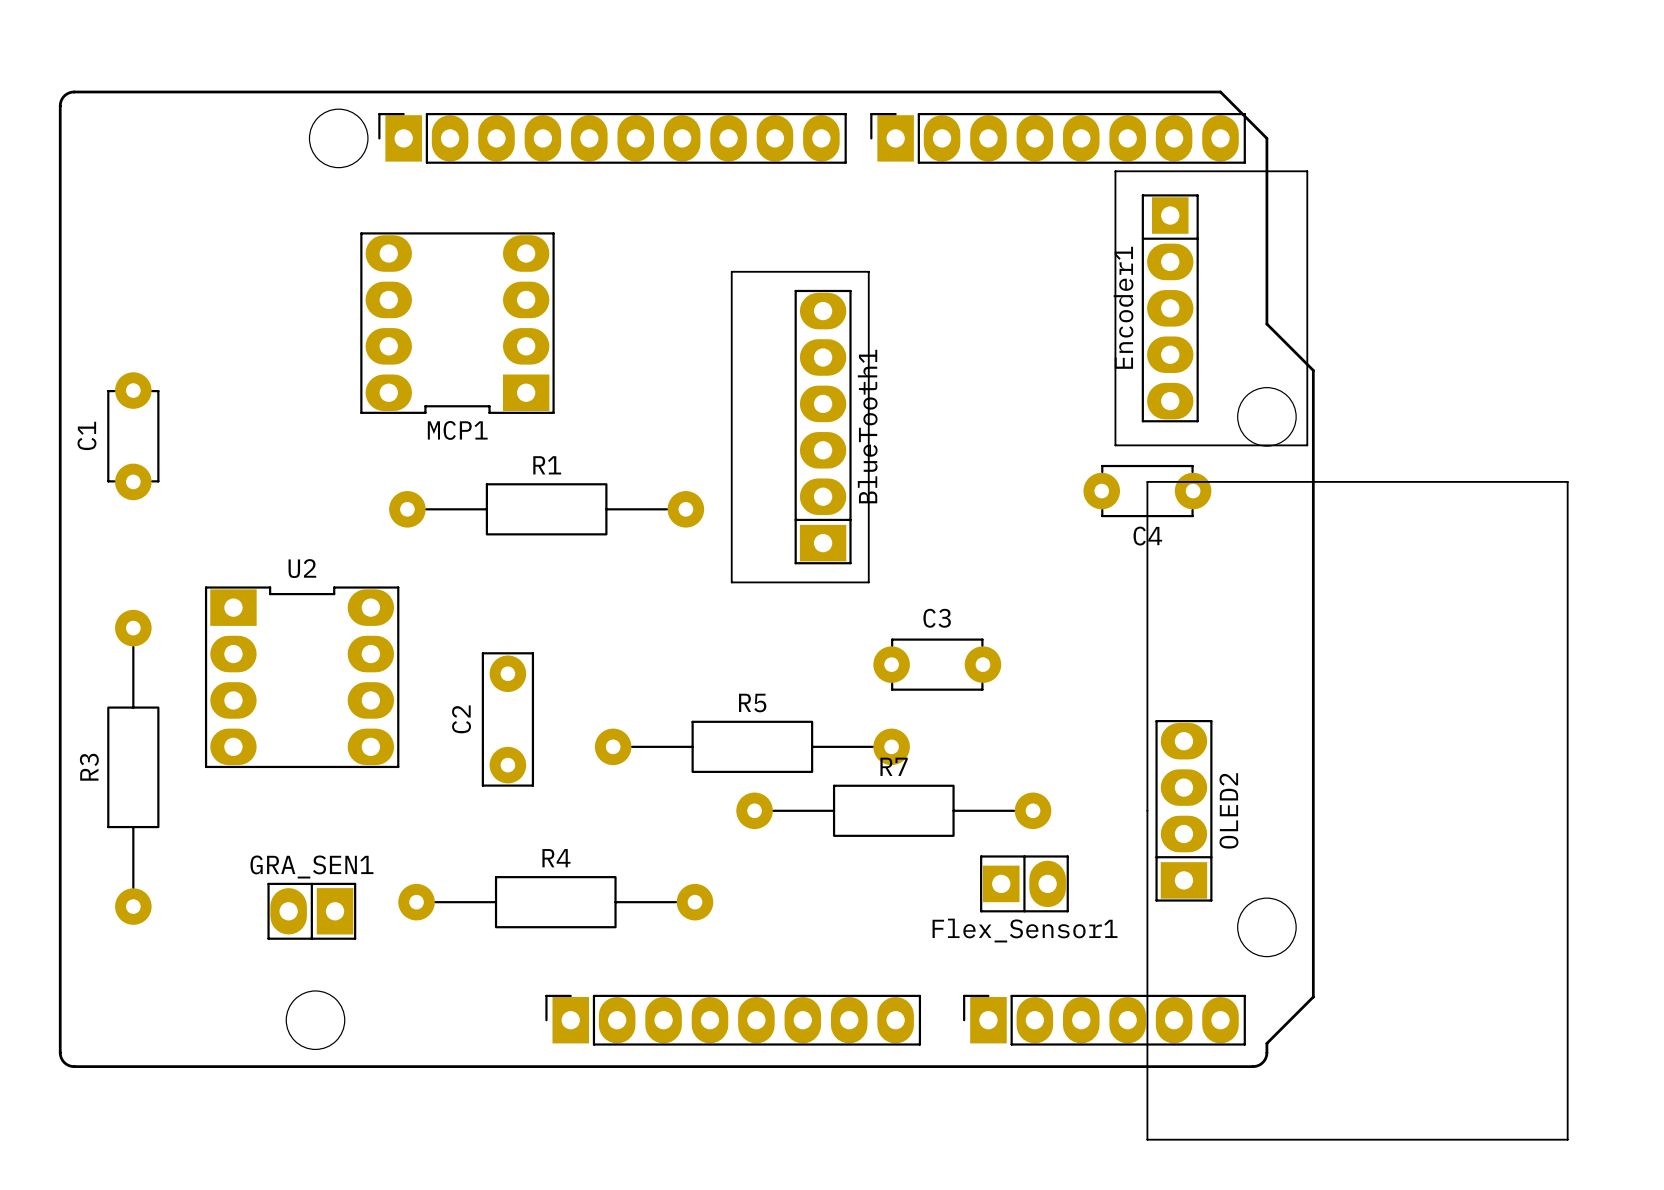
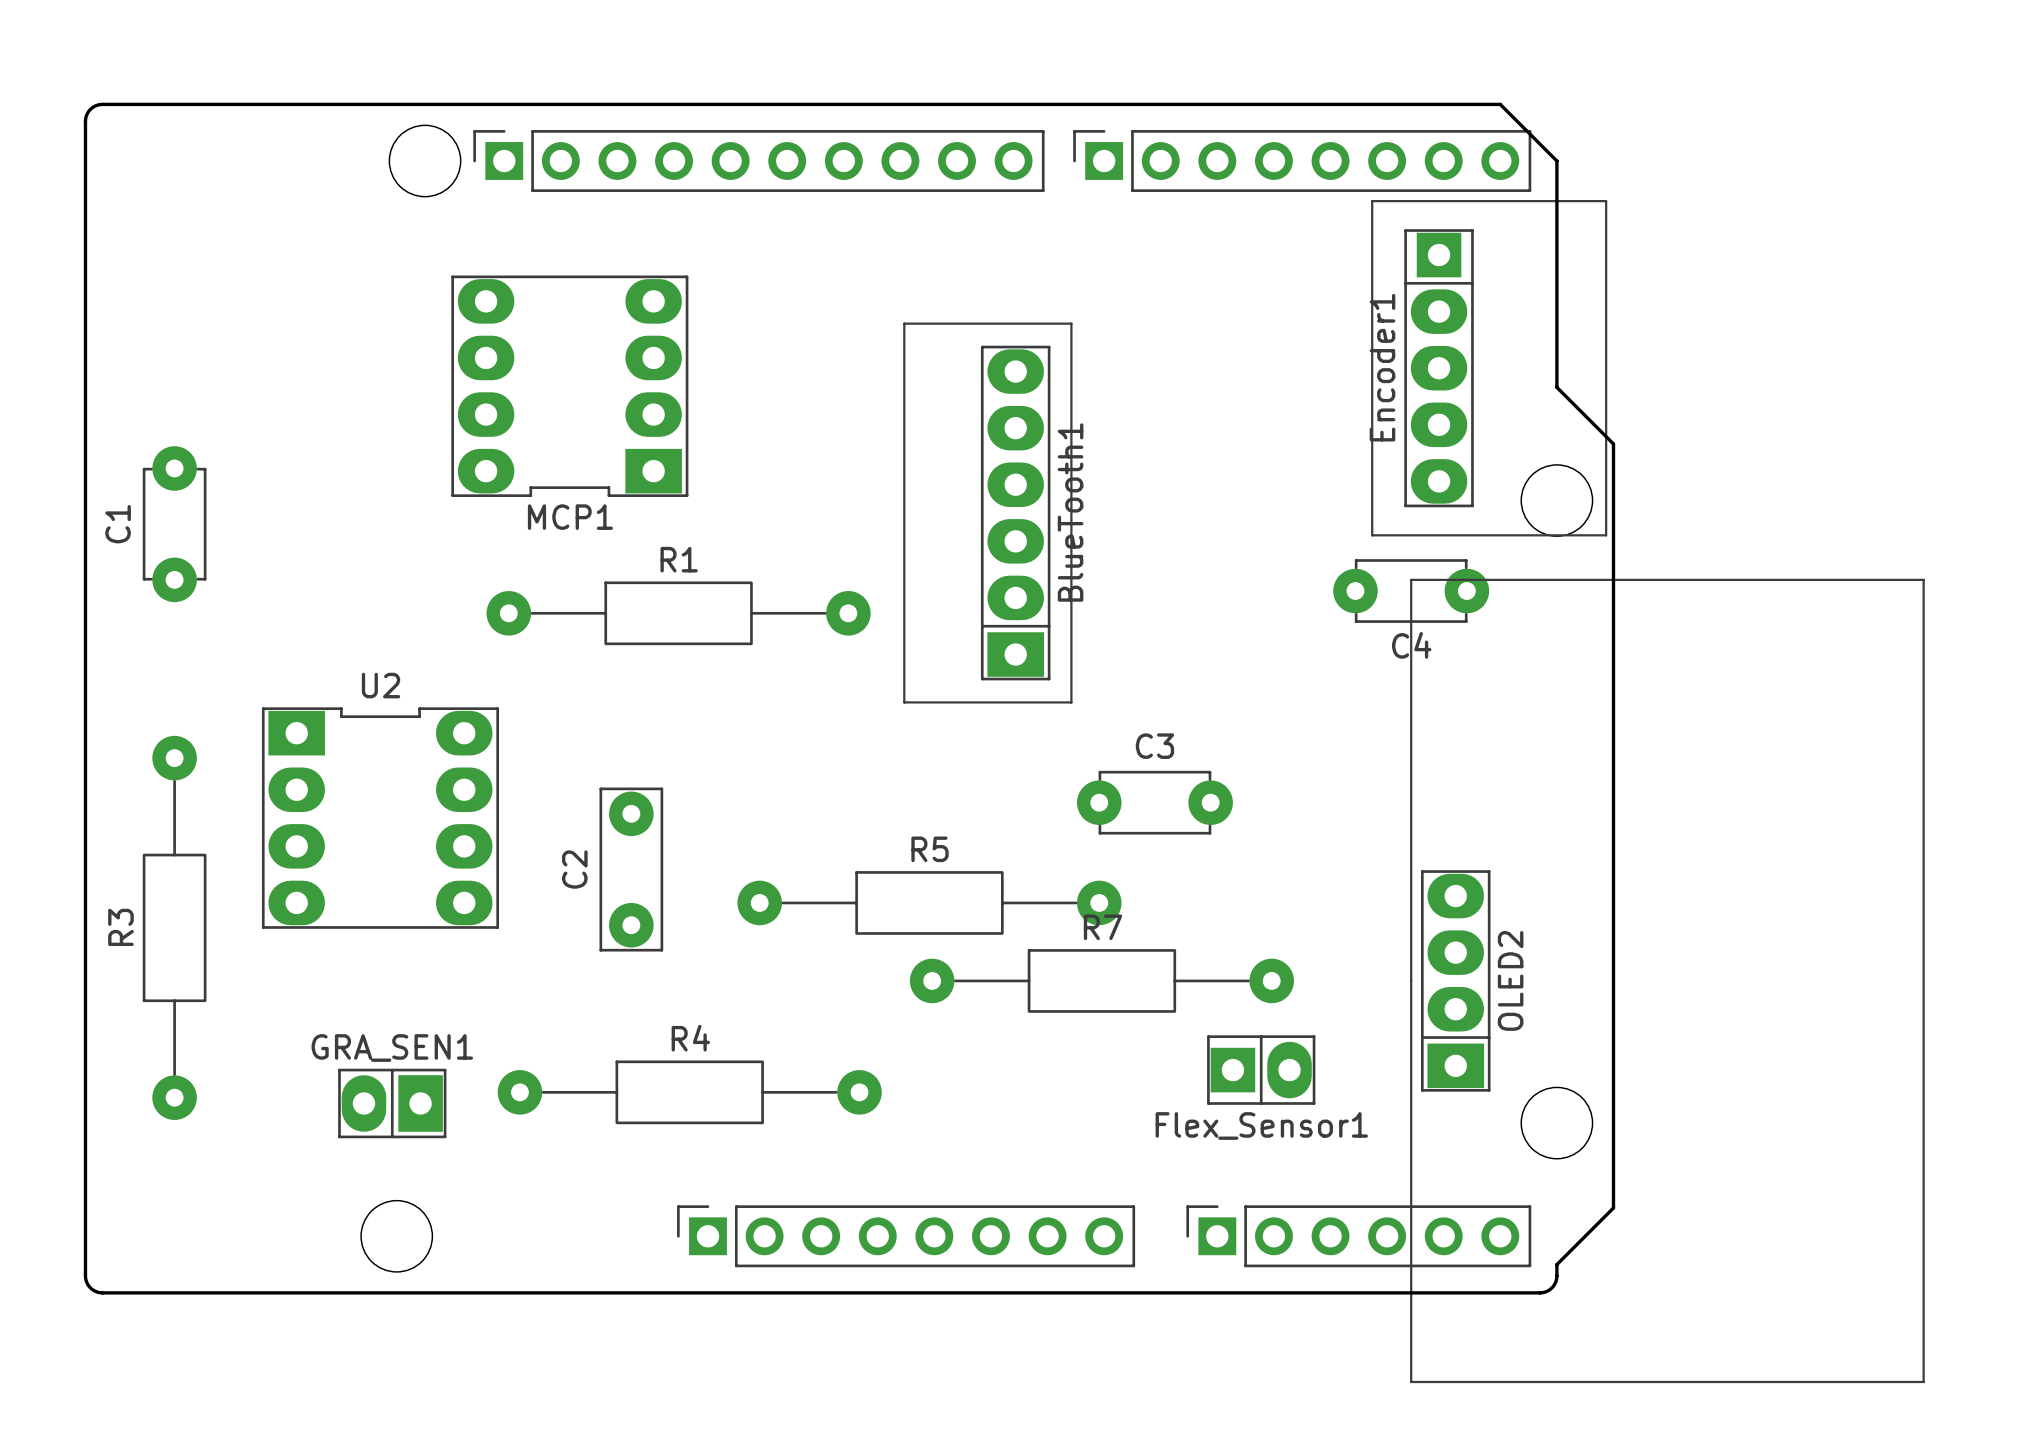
part footprint: [378, 113, 847, 164] -> [473, 130, 1045, 192]
part footprint: [870, 113, 1246, 164] -> [1073, 130, 1532, 192]
part footprint: [545, 994, 922, 1046] -> [677, 1205, 1136, 1268]
part footprint: [963, 994, 1246, 1046] -> [1186, 1205, 1532, 1268]

